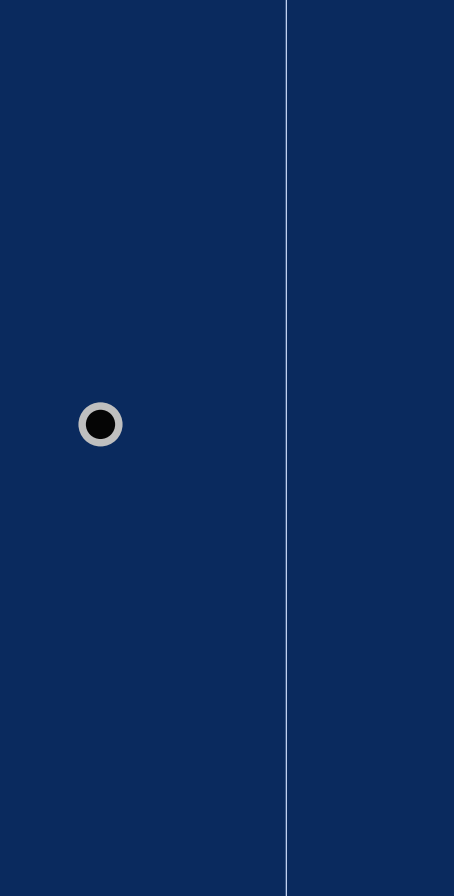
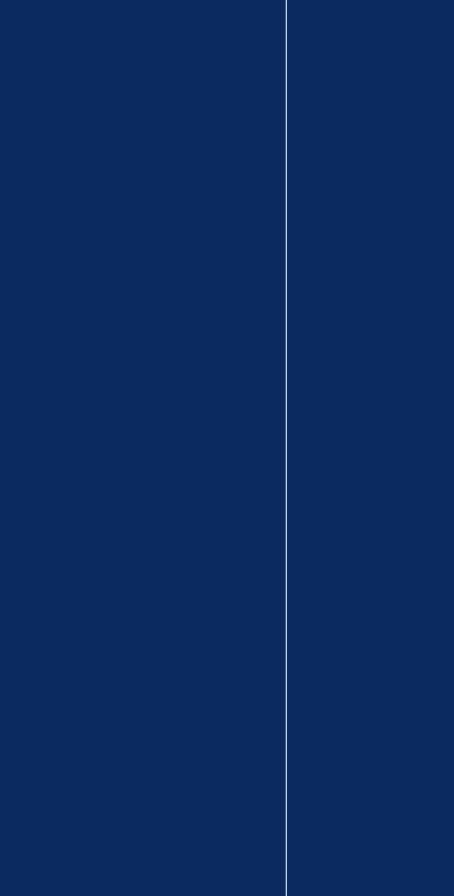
via: (100, 424) -> none

